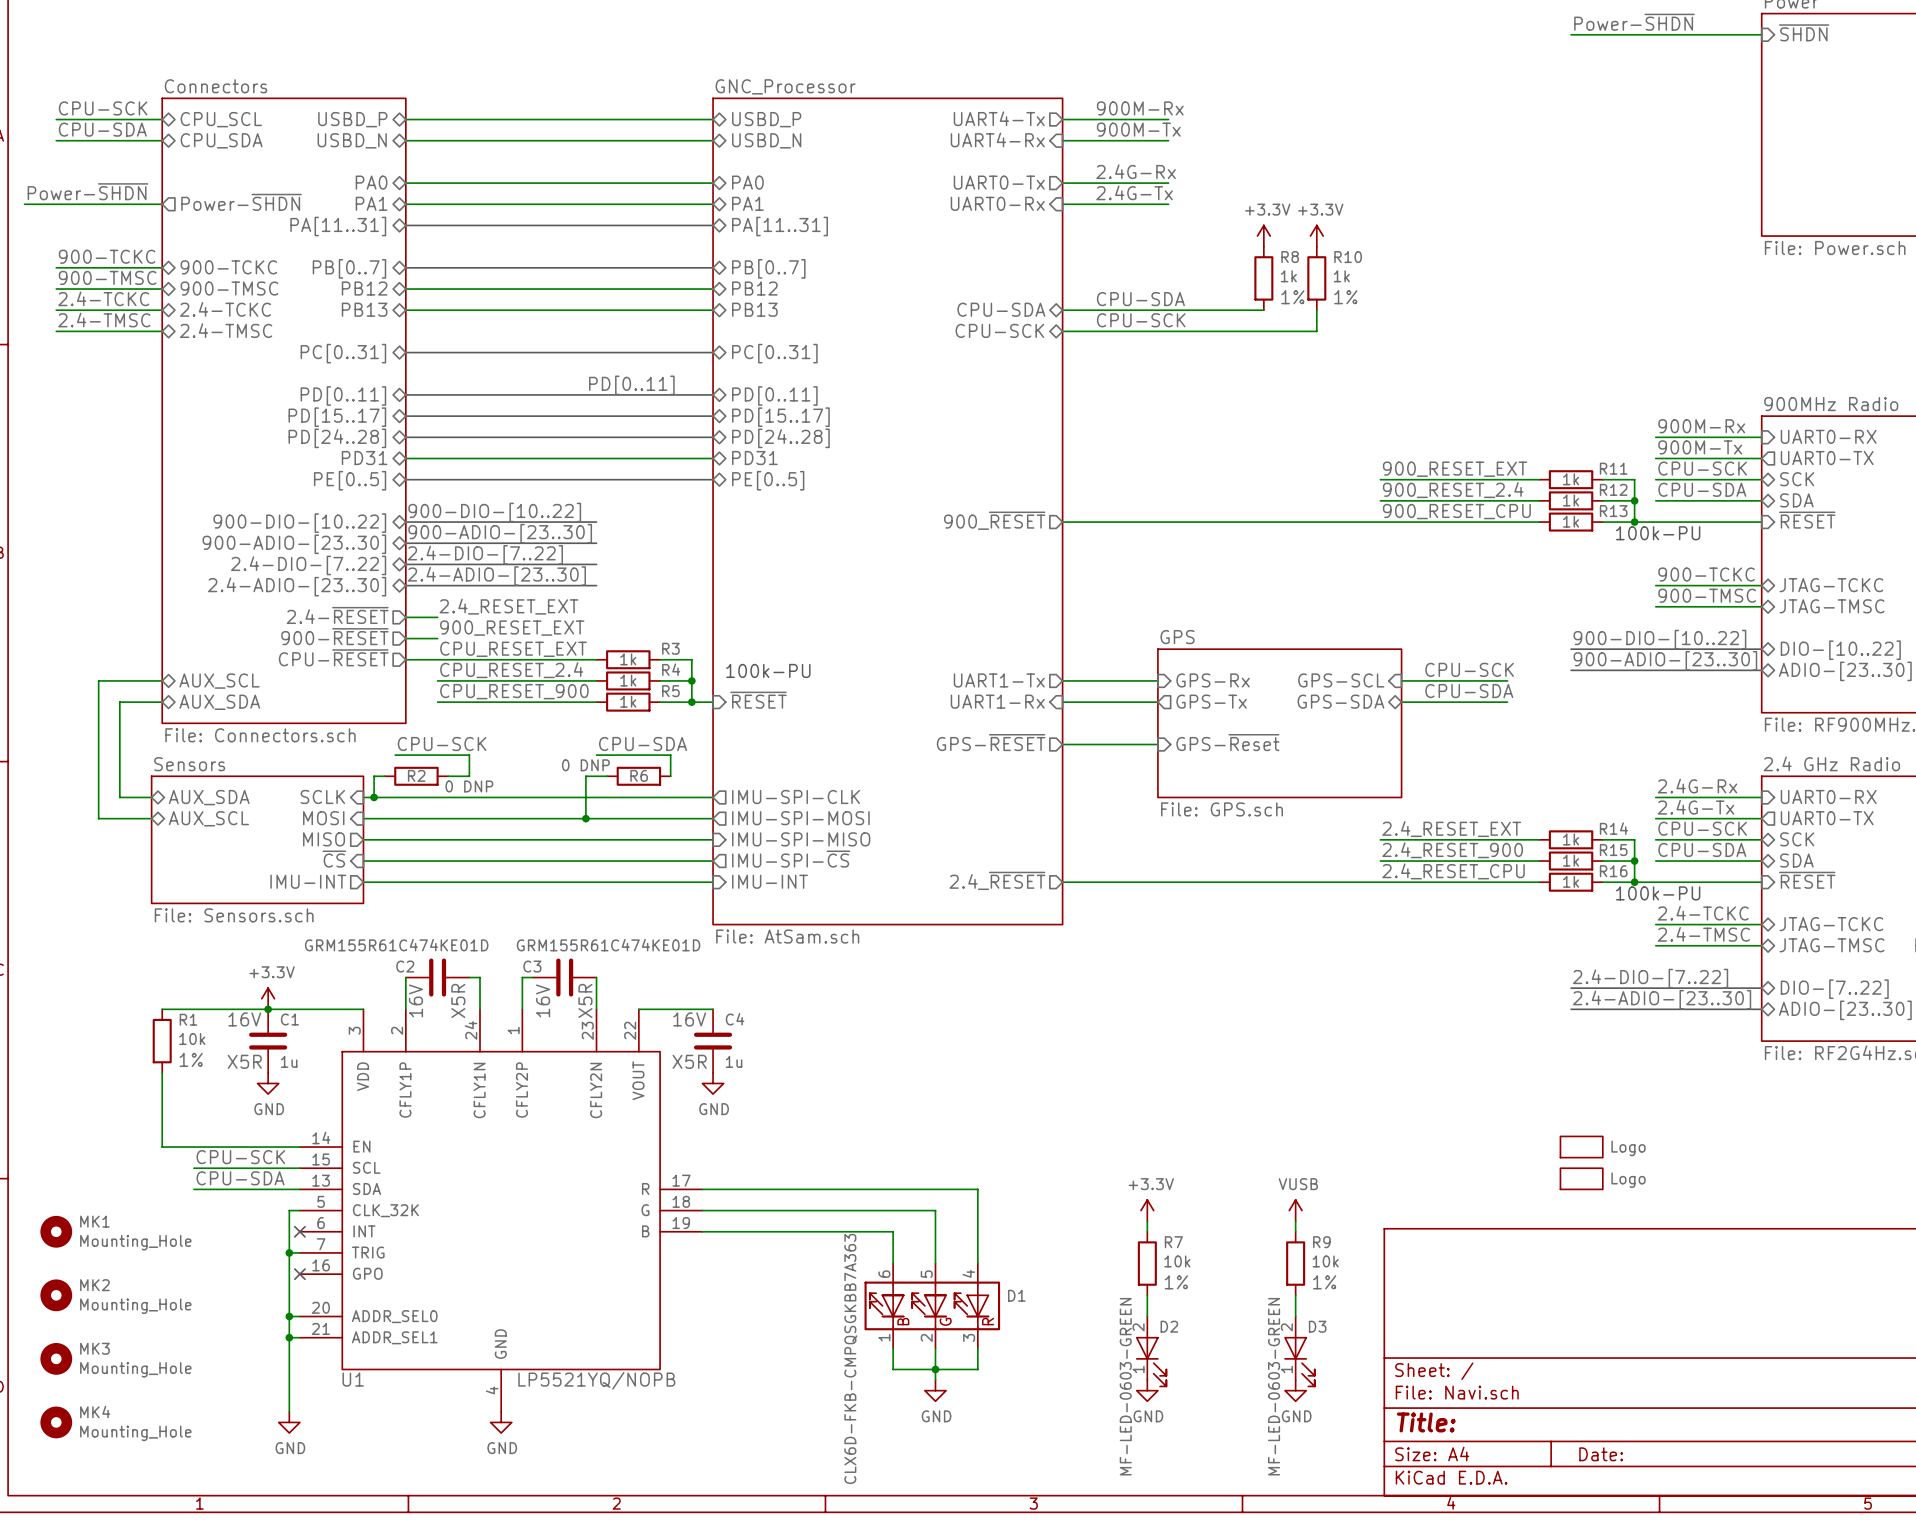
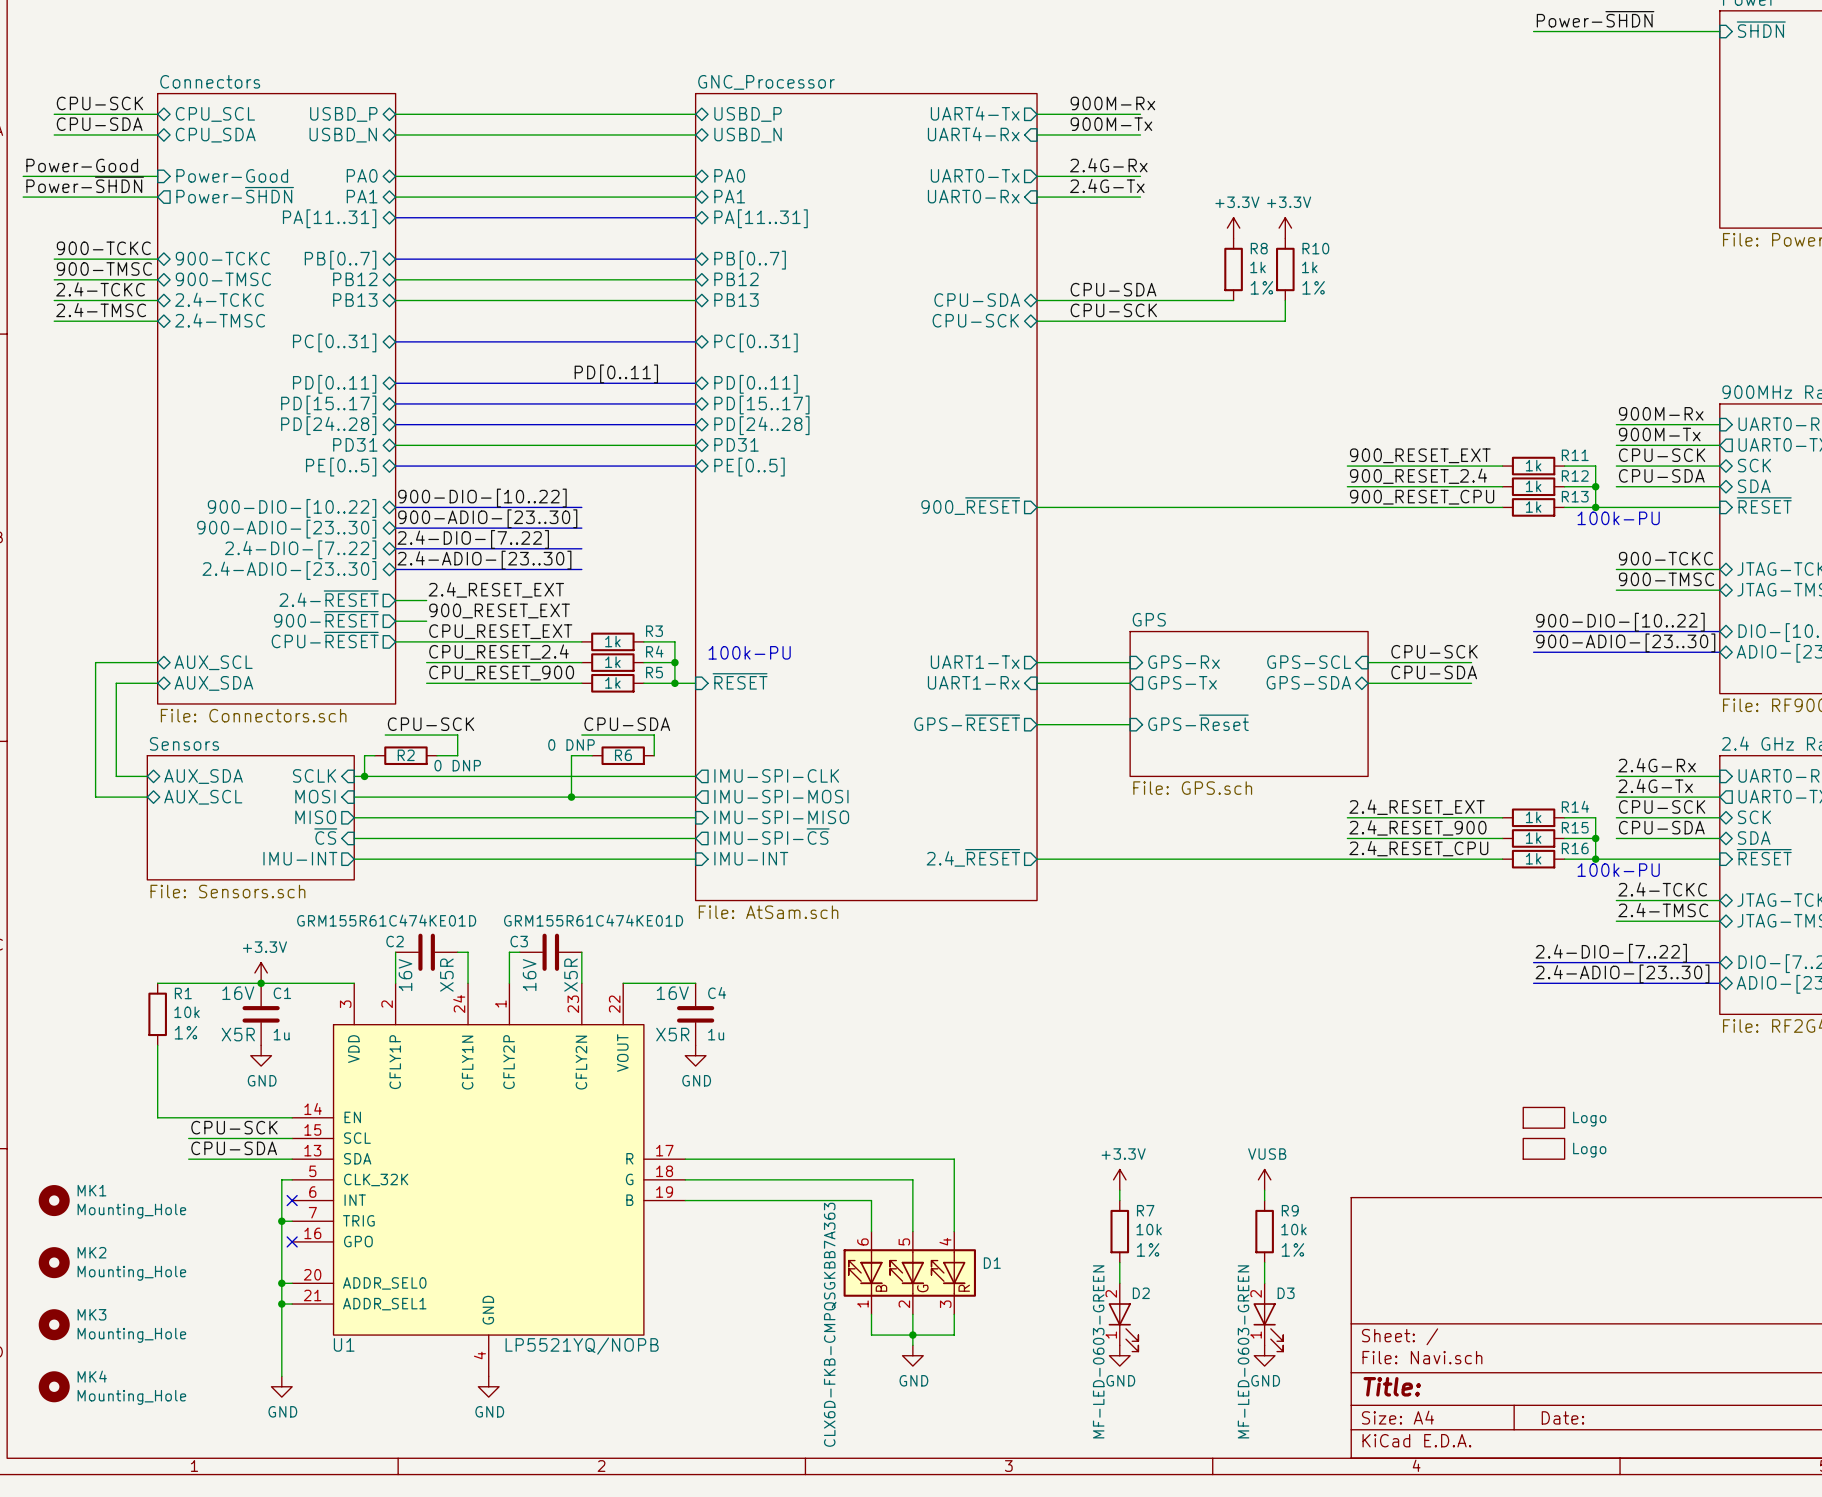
label: none -> Power-Good (82, 165)
sheet pin: none -> Power-Good (232, 175)
wire: none -> (23, 176) (157, 176)

